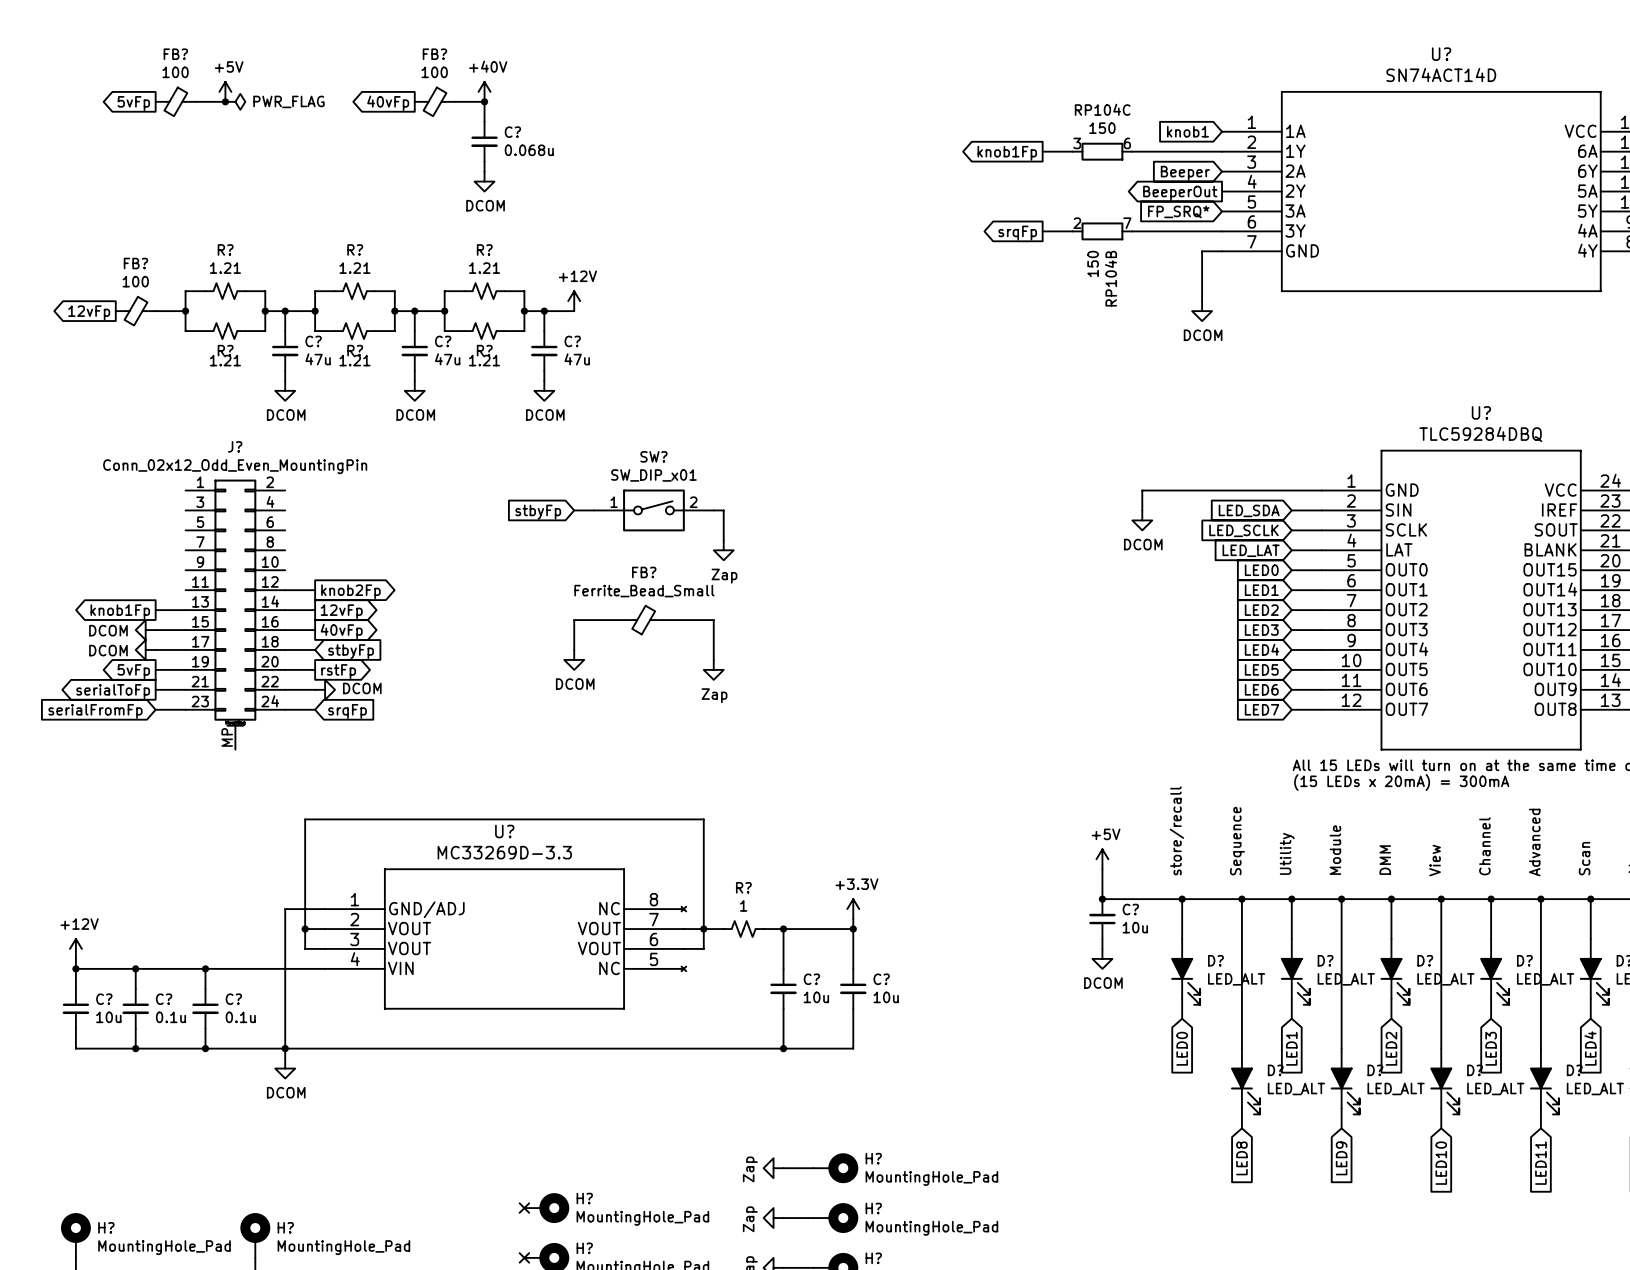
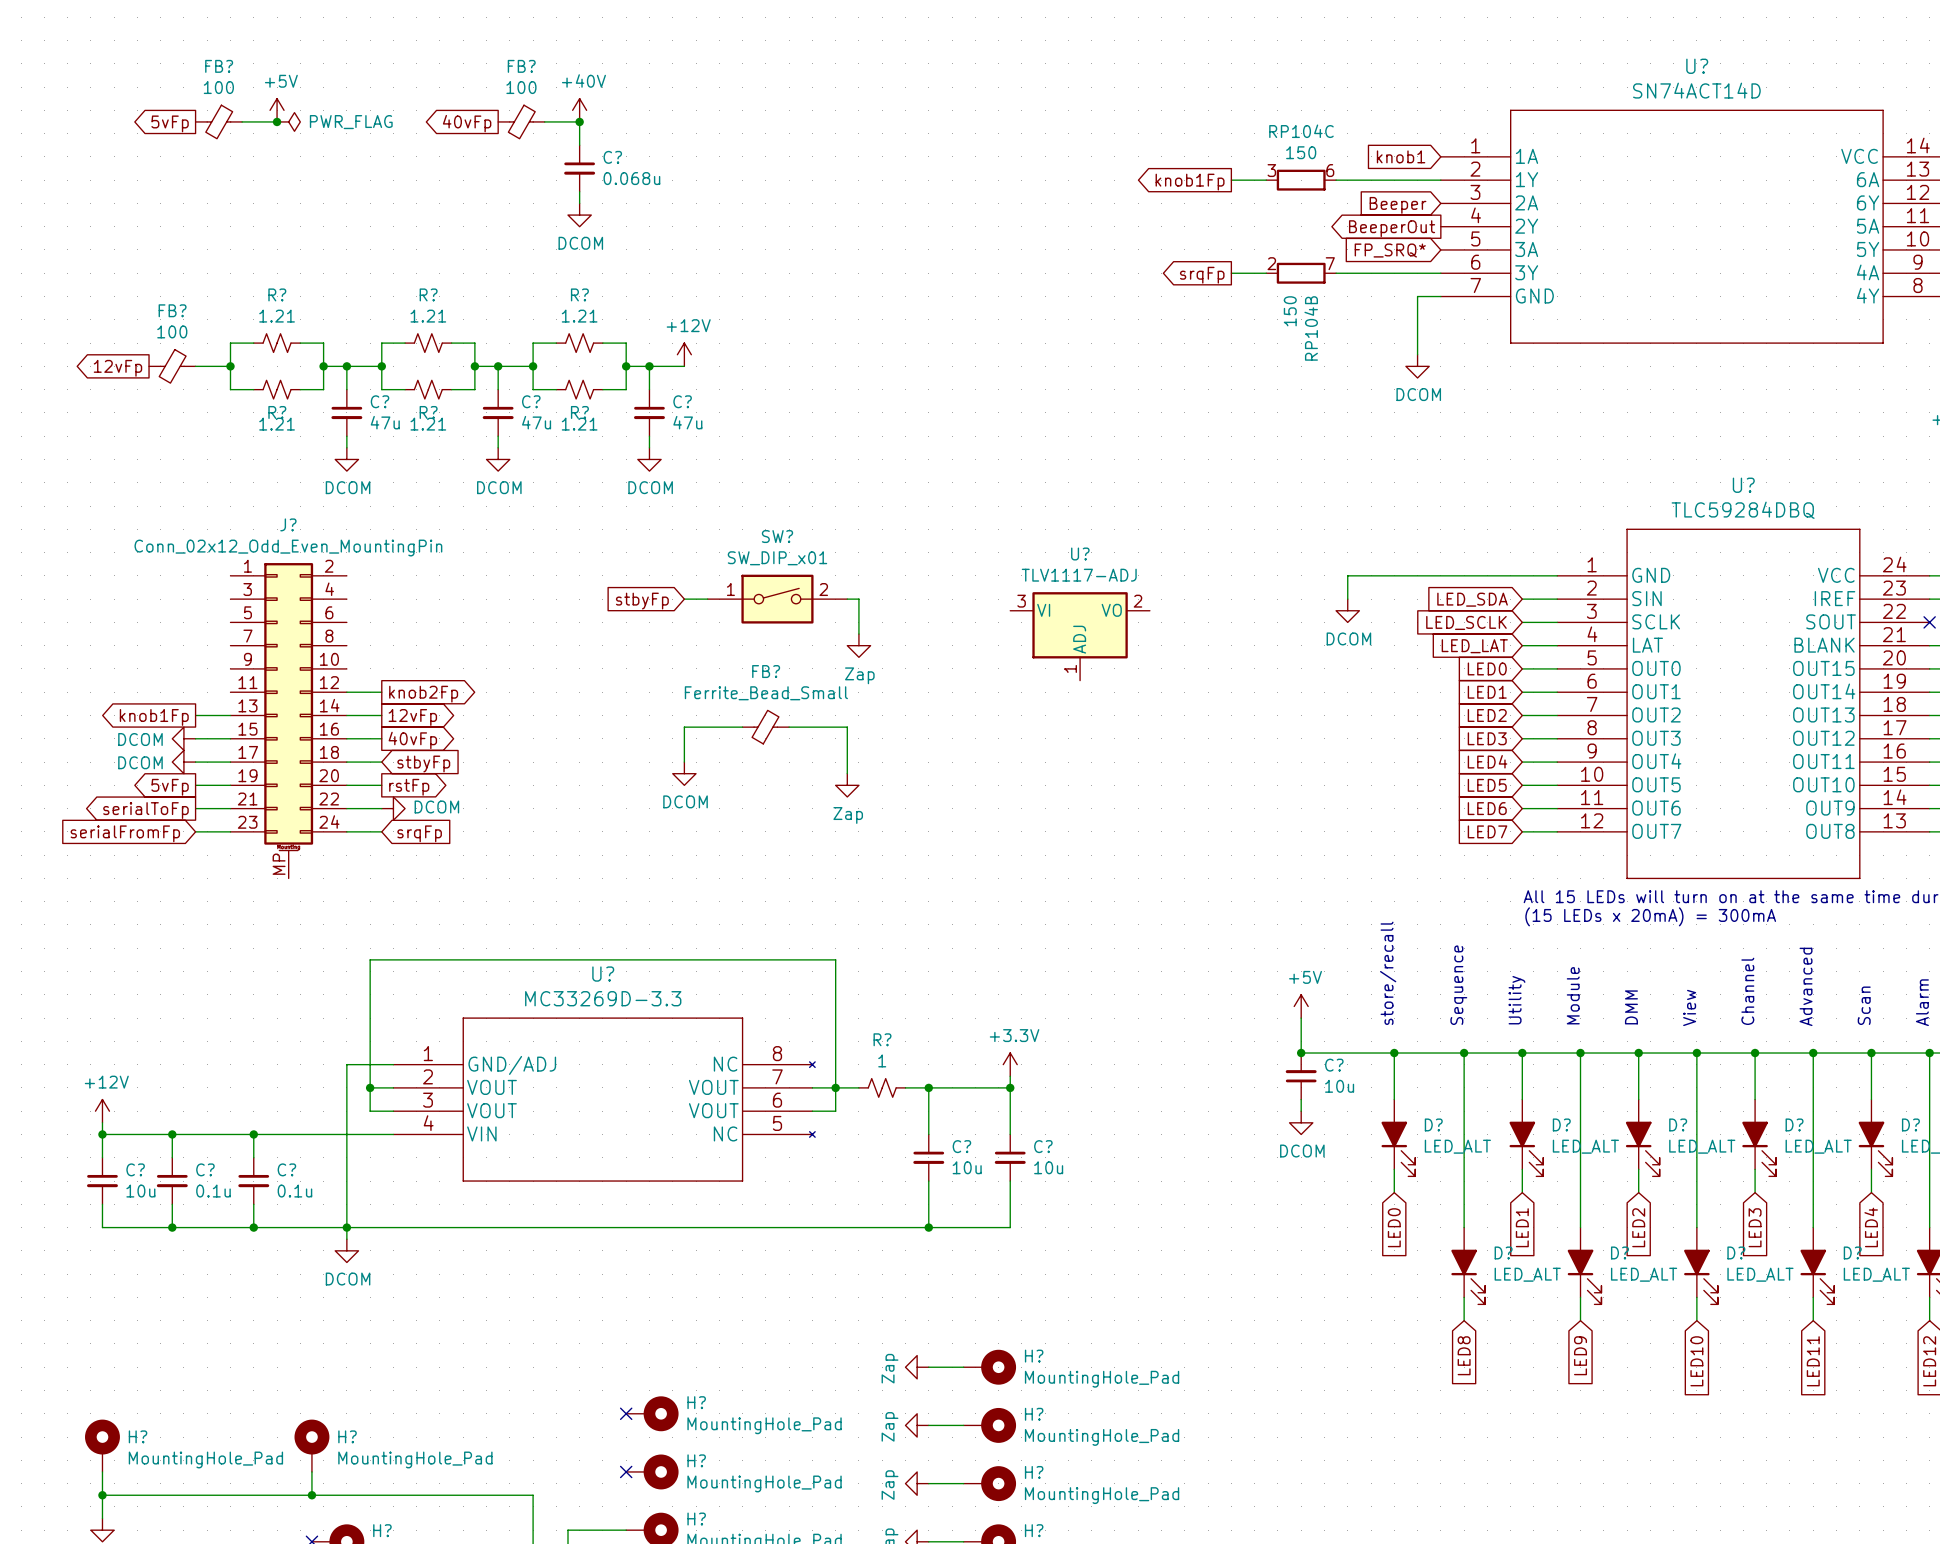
U?: none -> TLV1117-ADJ (1080, 636)

